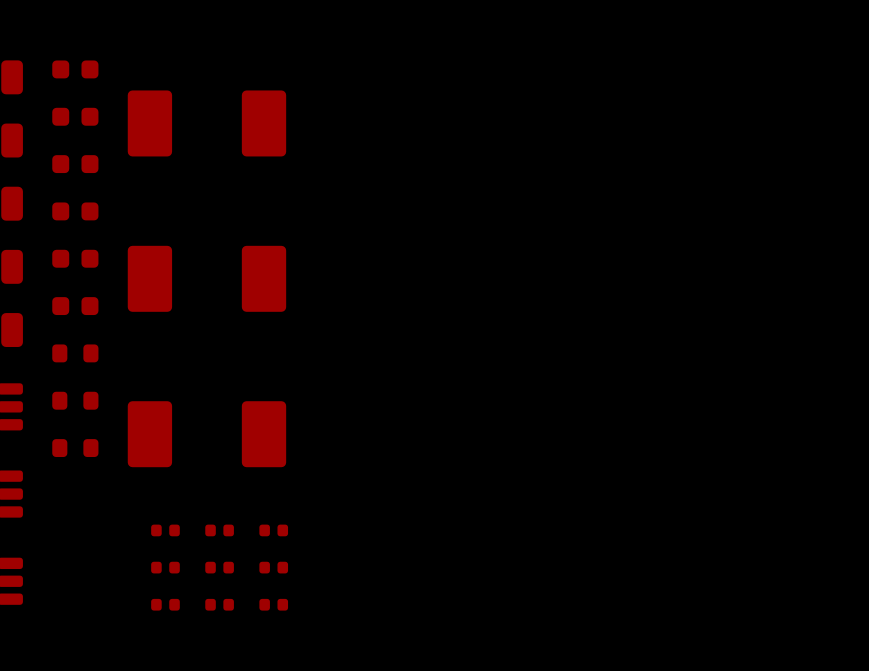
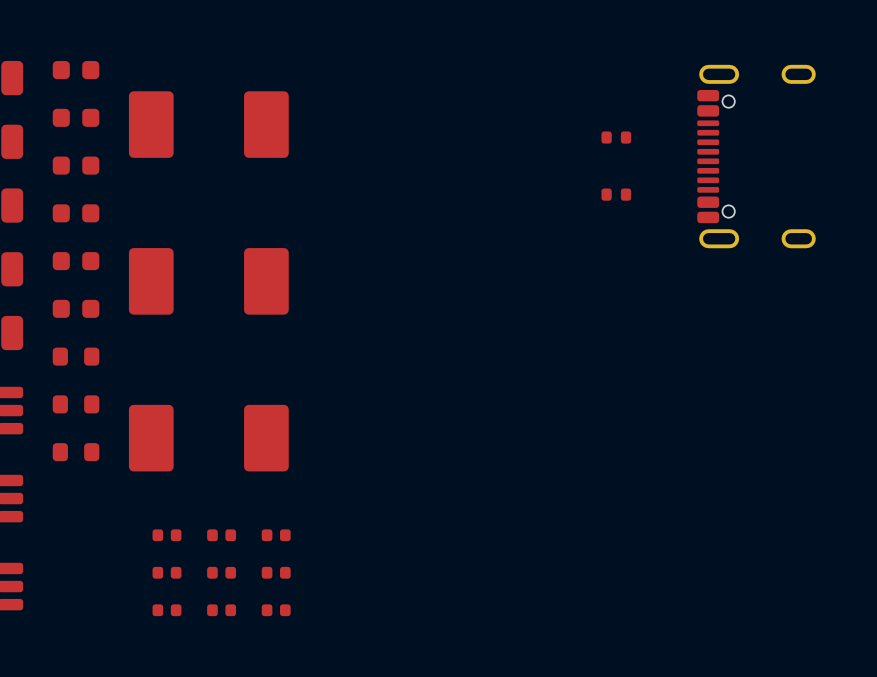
part: none -> (616, 137)
part: none -> (756, 156)
part: none -> (616, 194)

